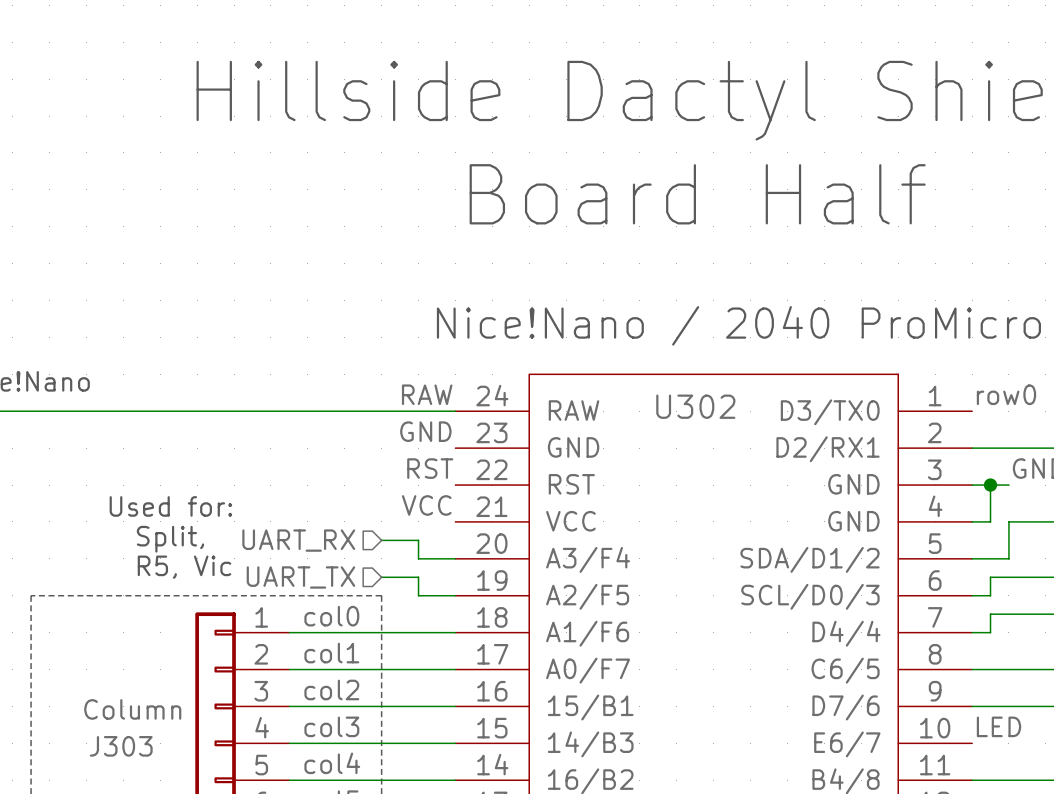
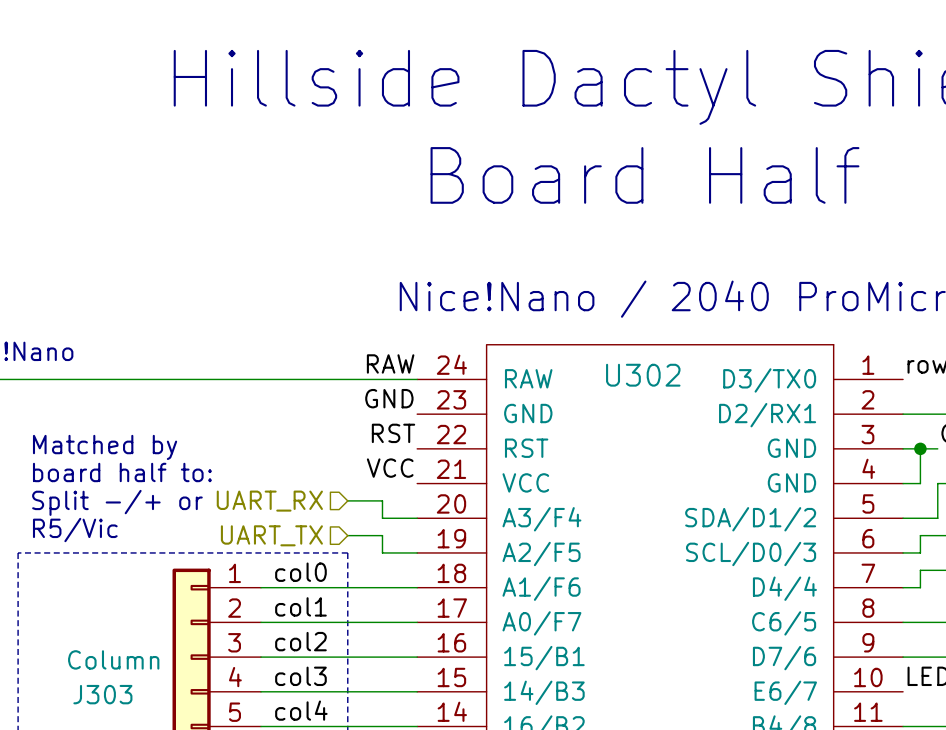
text: none -> Matched by (105, 447)
text: Used for: (170, 506) -> none
text: none -> board half to: (122, 472)
text: Split, (170, 539) -> none
text: none -> Split -/+ or (117, 502)
text: R5, Vic (184, 567) -> R5/Vic (75, 530)

